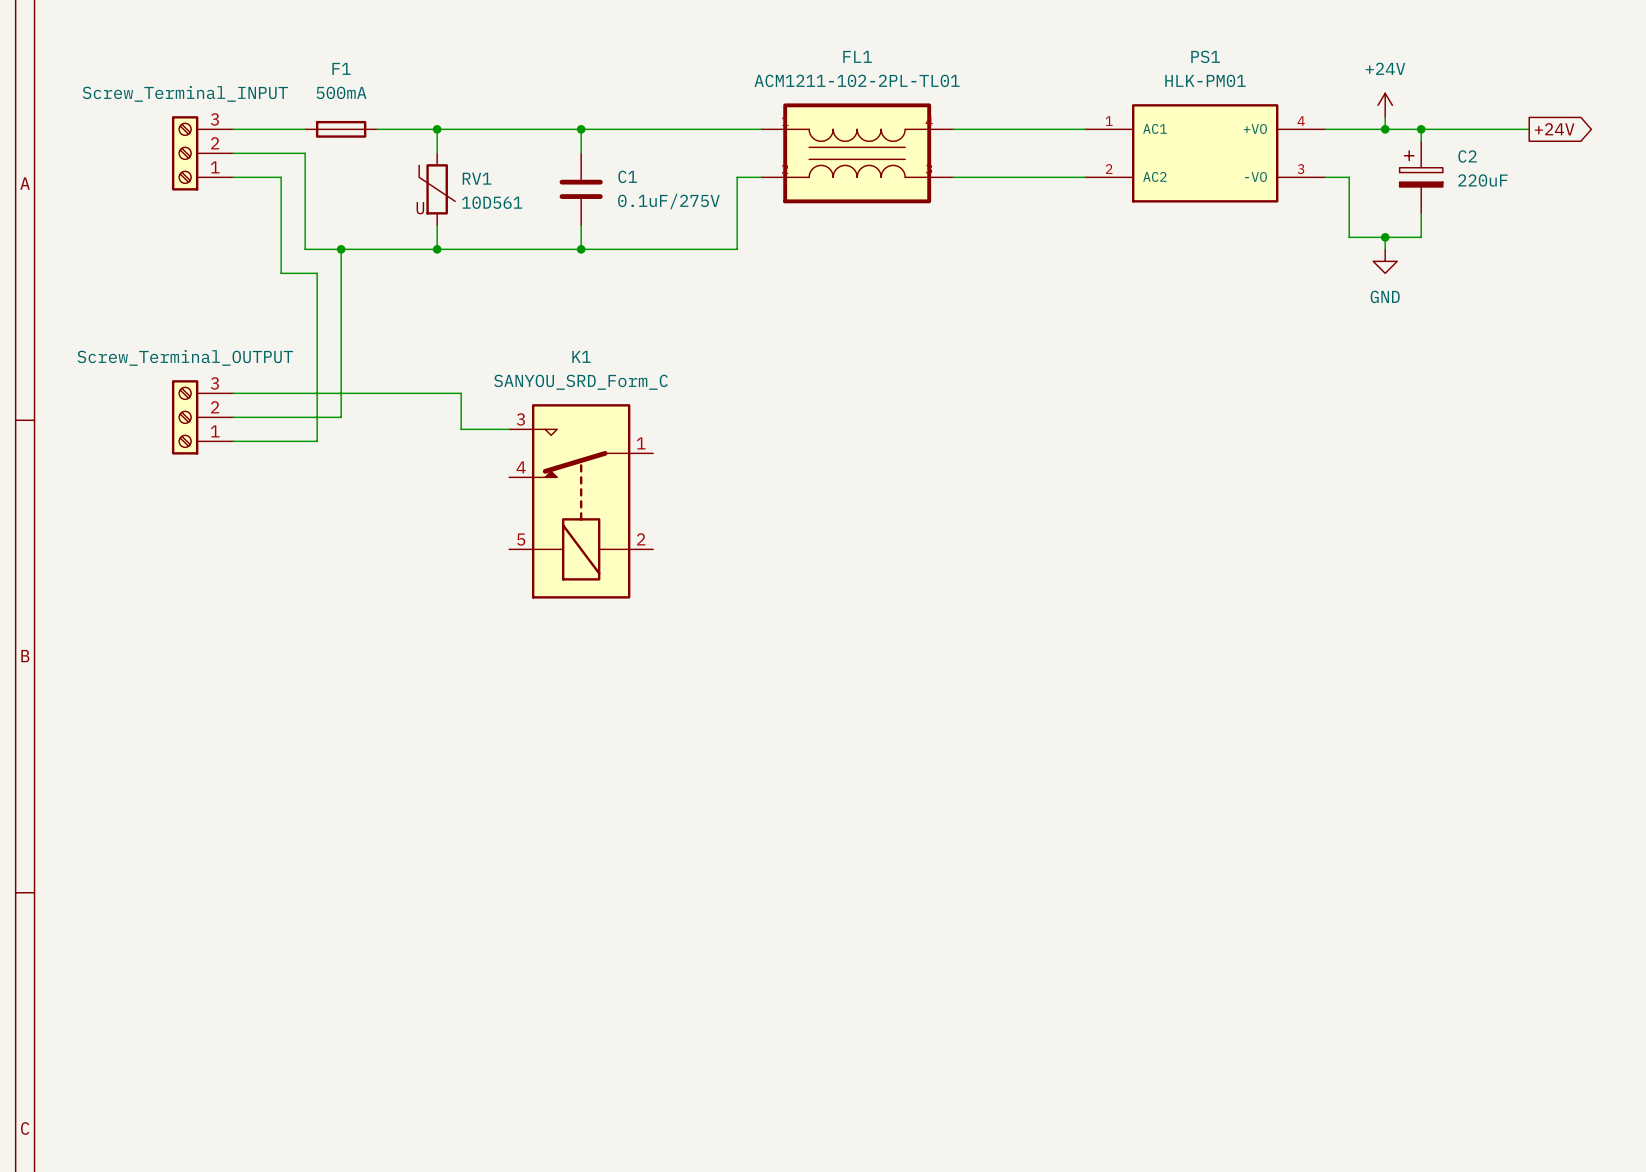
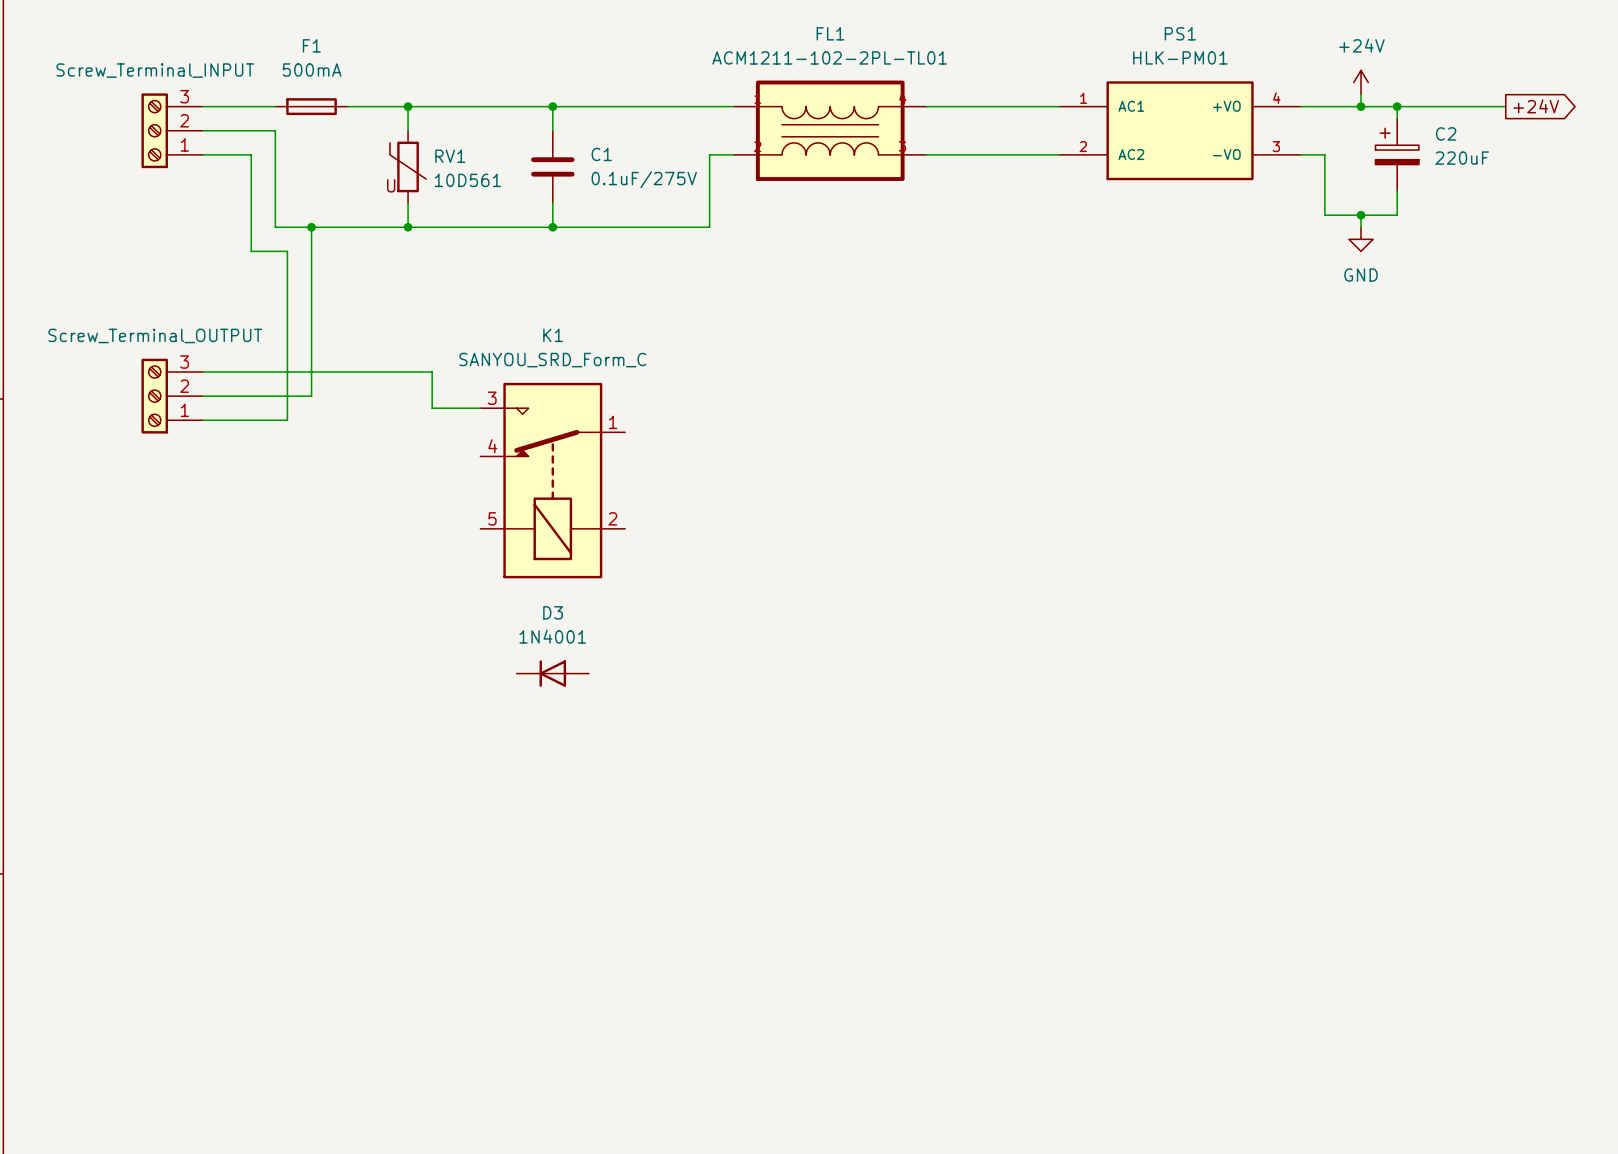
D3: none -> 1N4001 (552, 673)

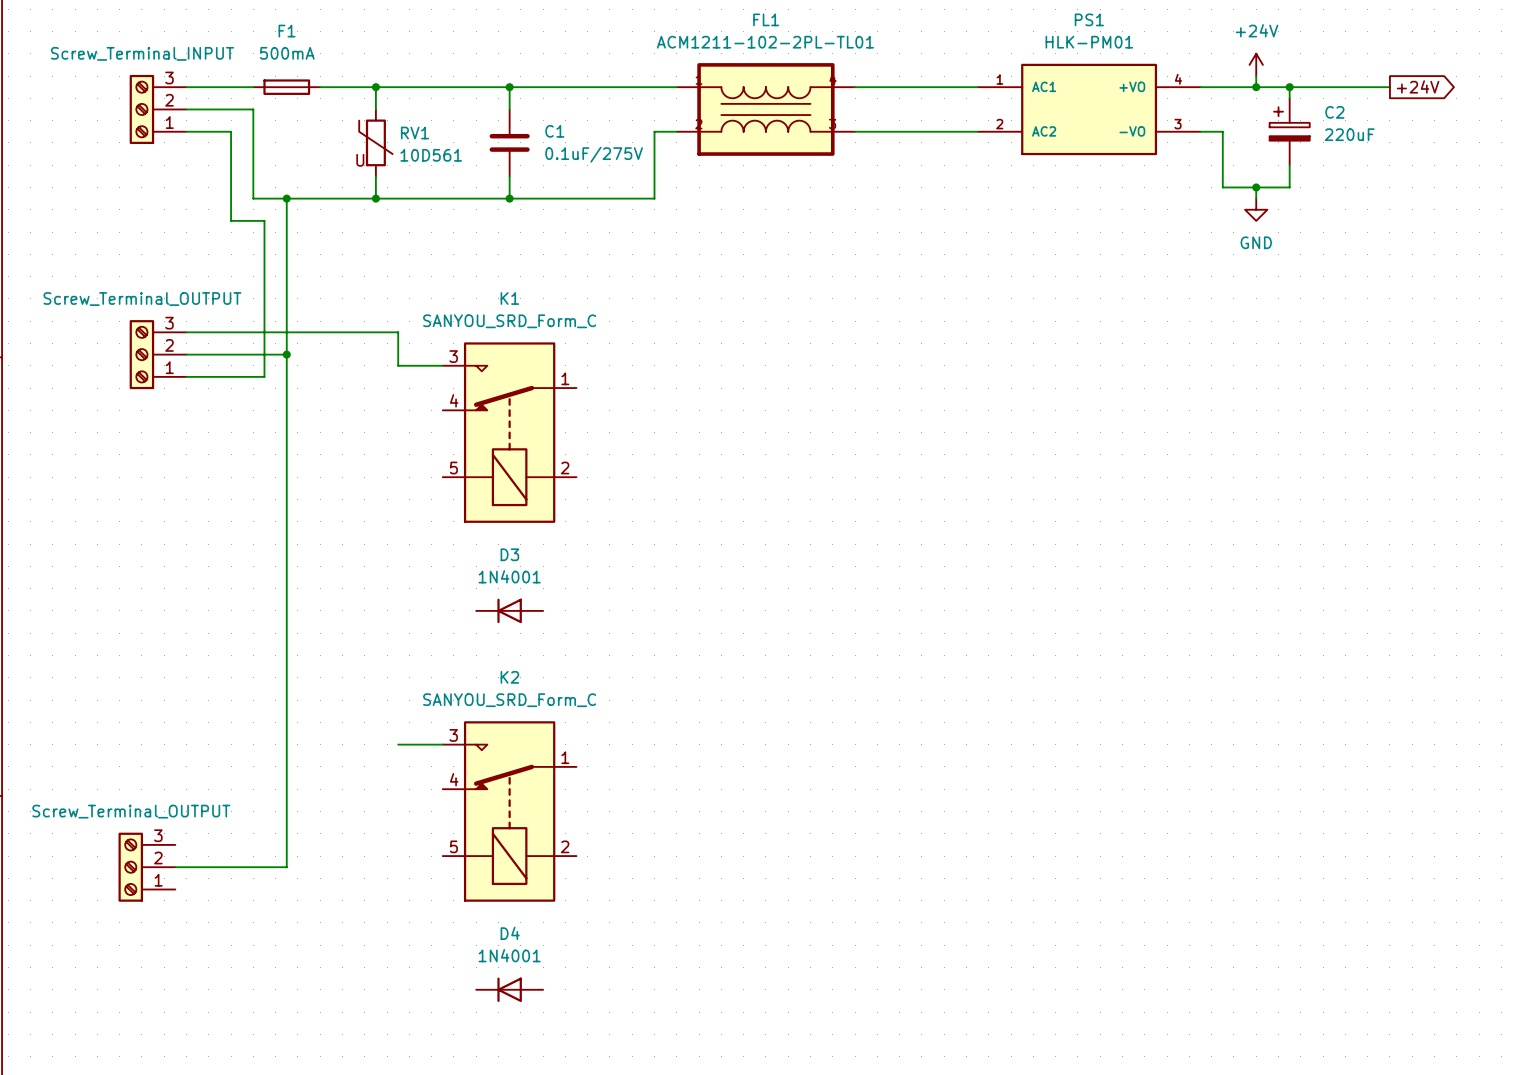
wire: none -> (286, 354) (286, 867) (175, 867)
junction: none -> (286, 354)
wire: none -> (398, 744) (442, 744)
K2: none -> SANYOU_SRD_Form_C (509, 811)
part: none -> Screw_Terminal_OUTPUT (146, 867)
D4: none -> 1N4001 (509, 989)

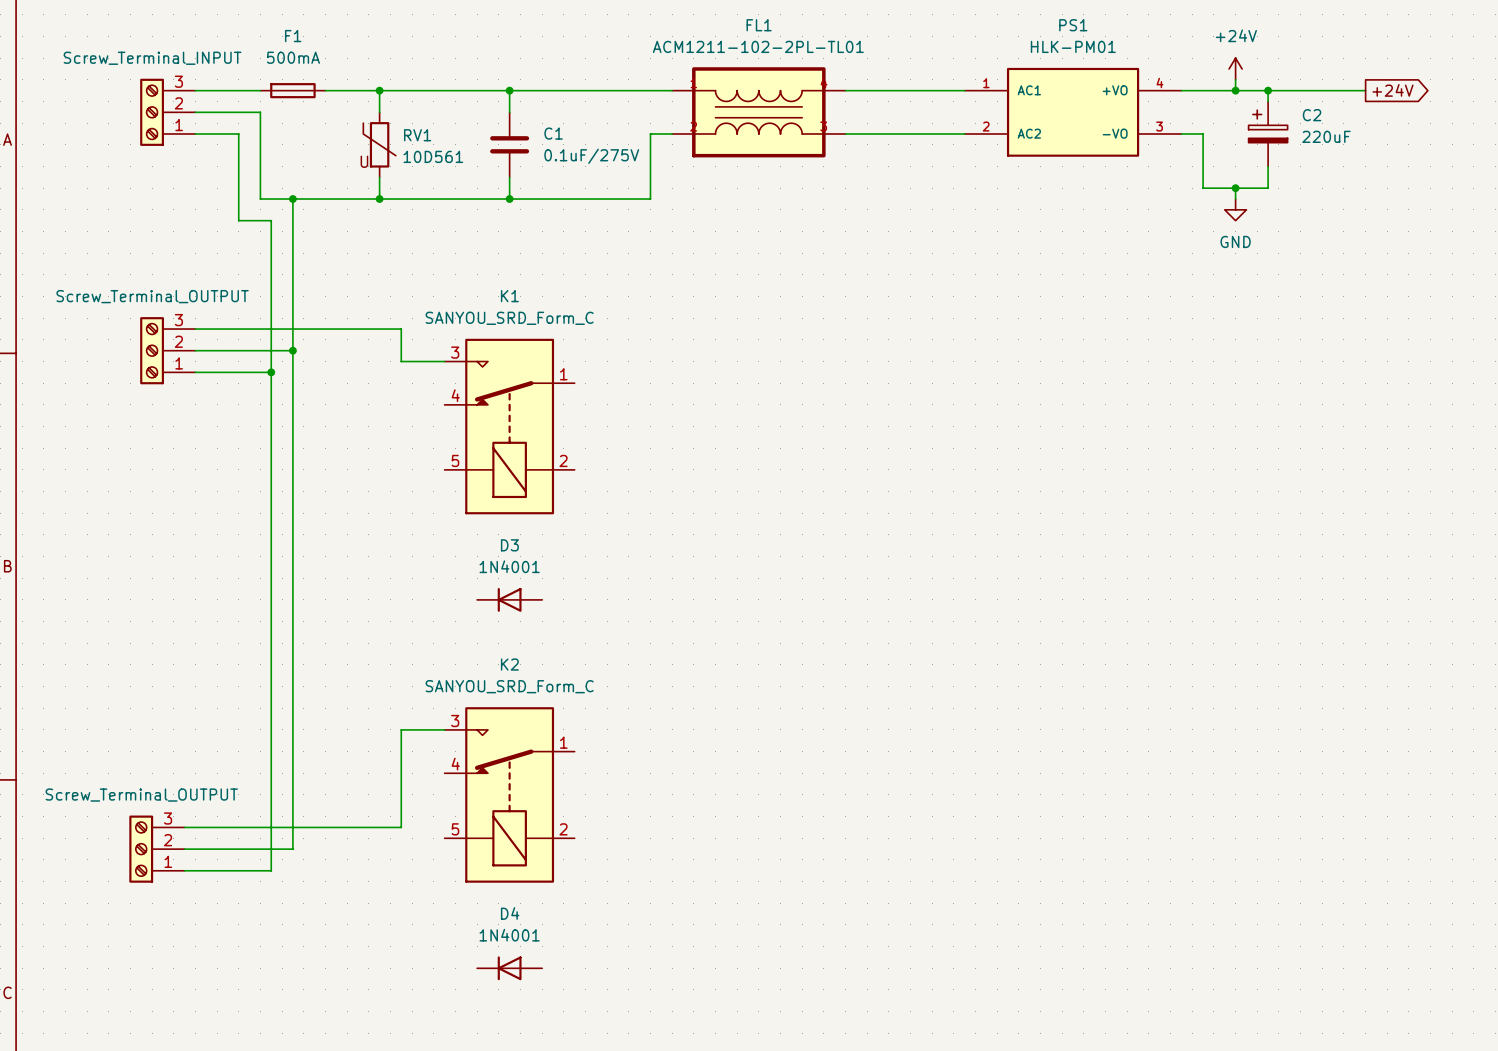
wire: none -> (271, 372) (271, 870) (184, 870)
junction: none -> (271, 372)
wire: none -> (401, 729) (401, 827) (184, 827)

